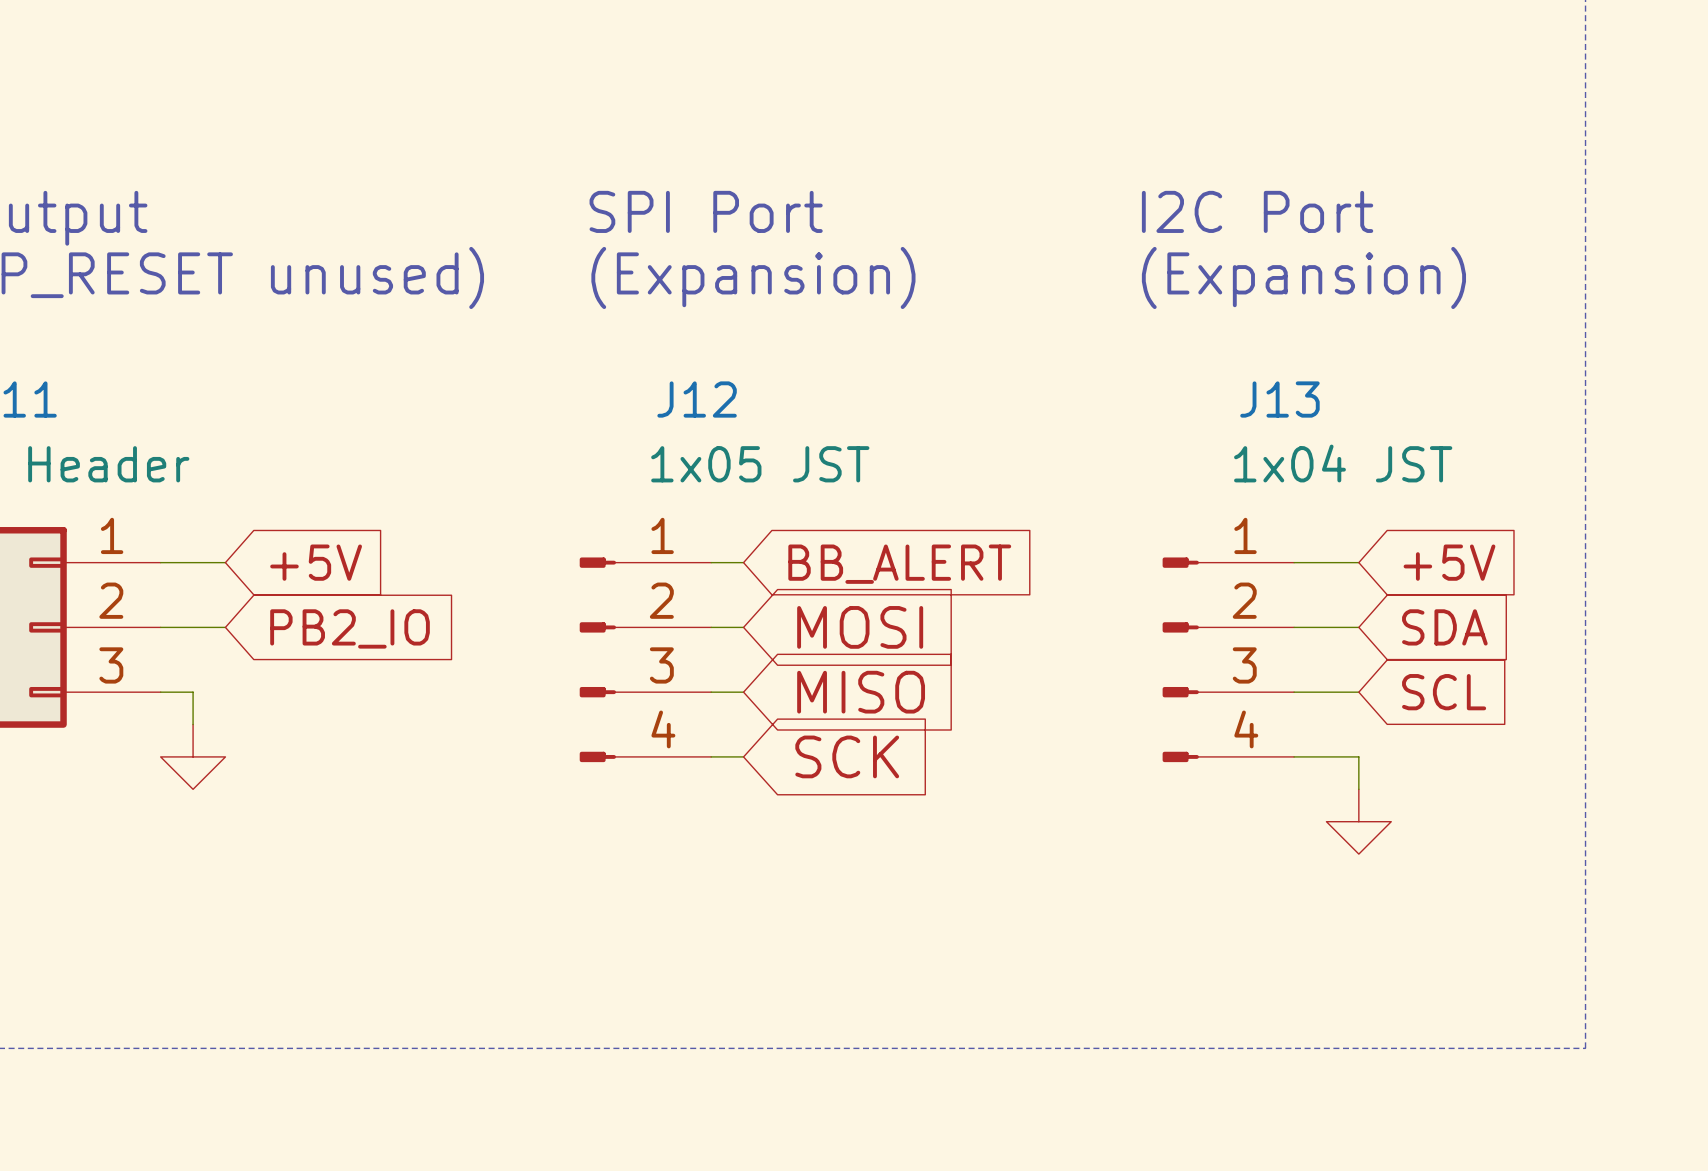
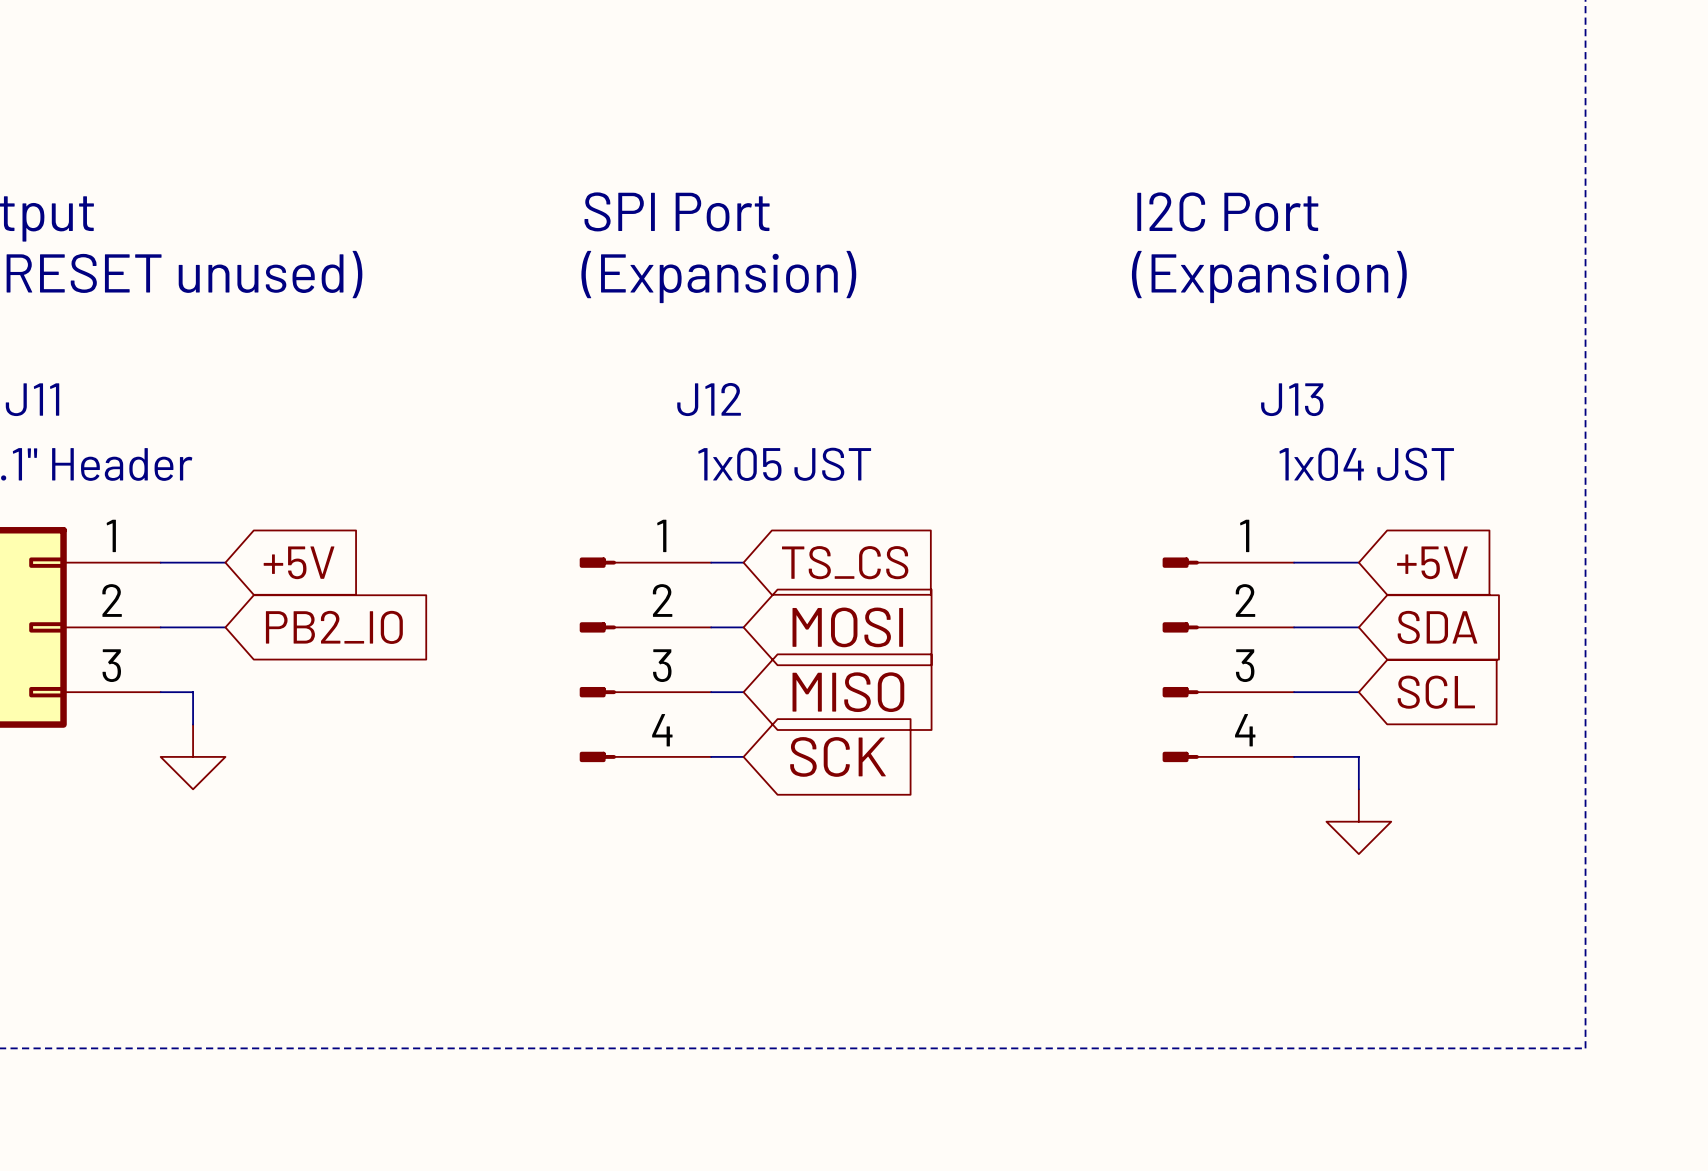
global label: BB_ALERT (899, 564) -> TS_CS (845, 562)

